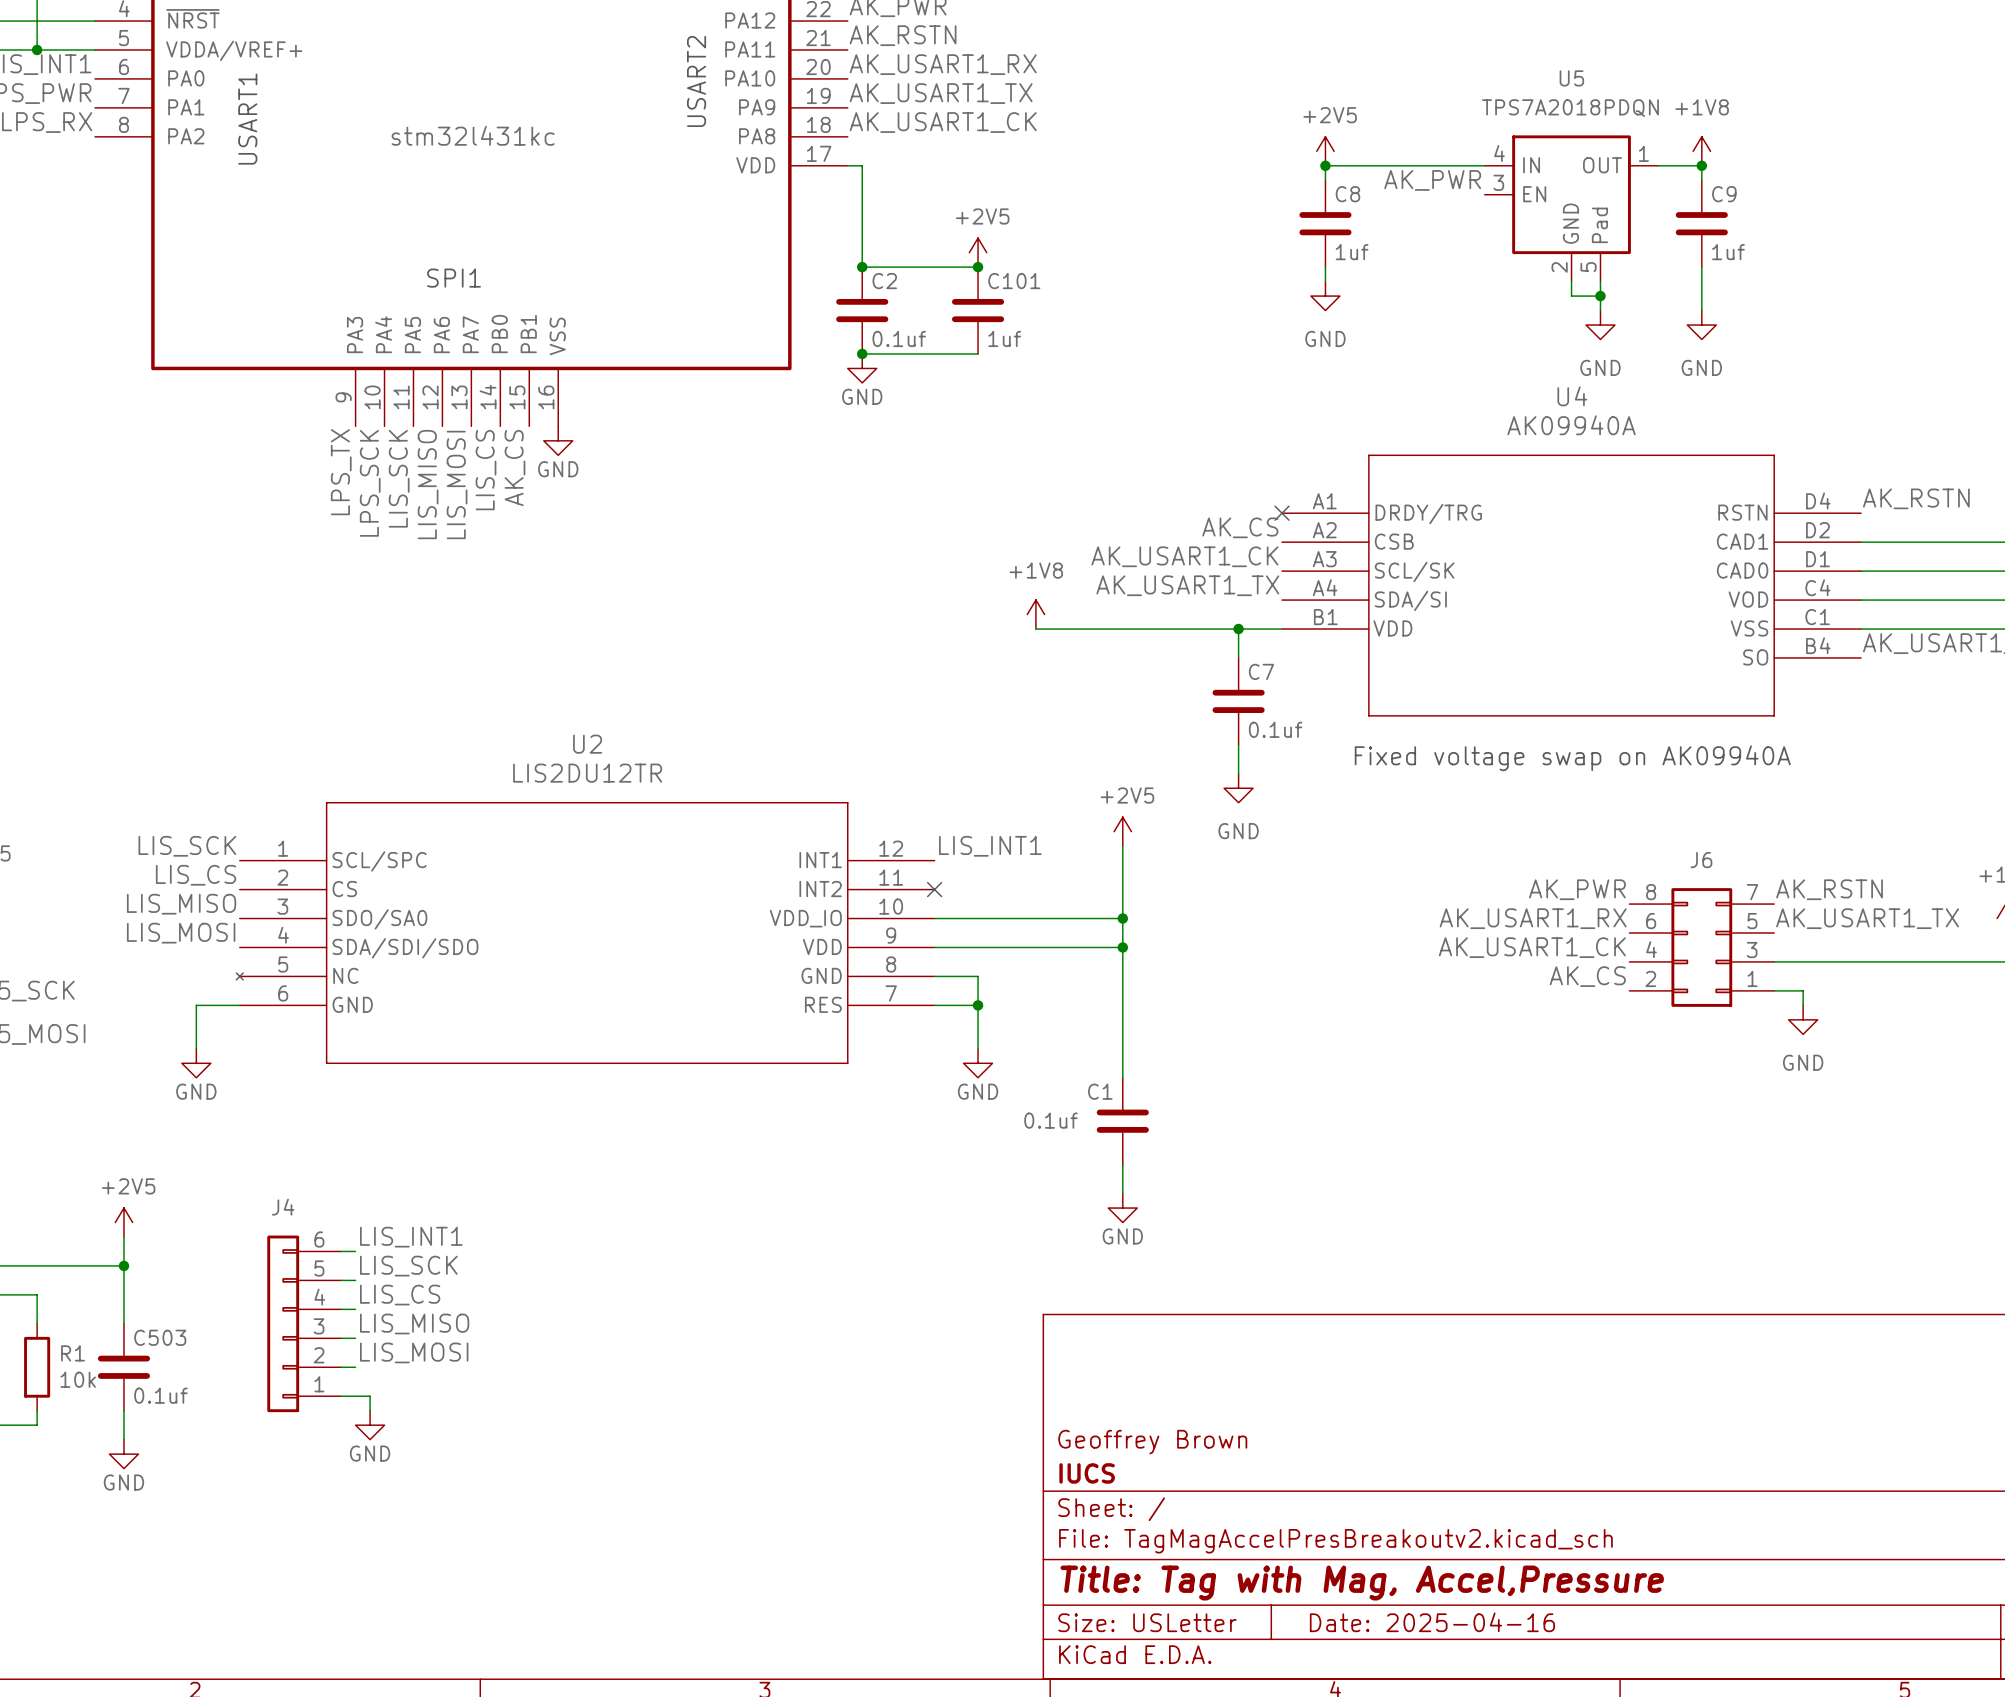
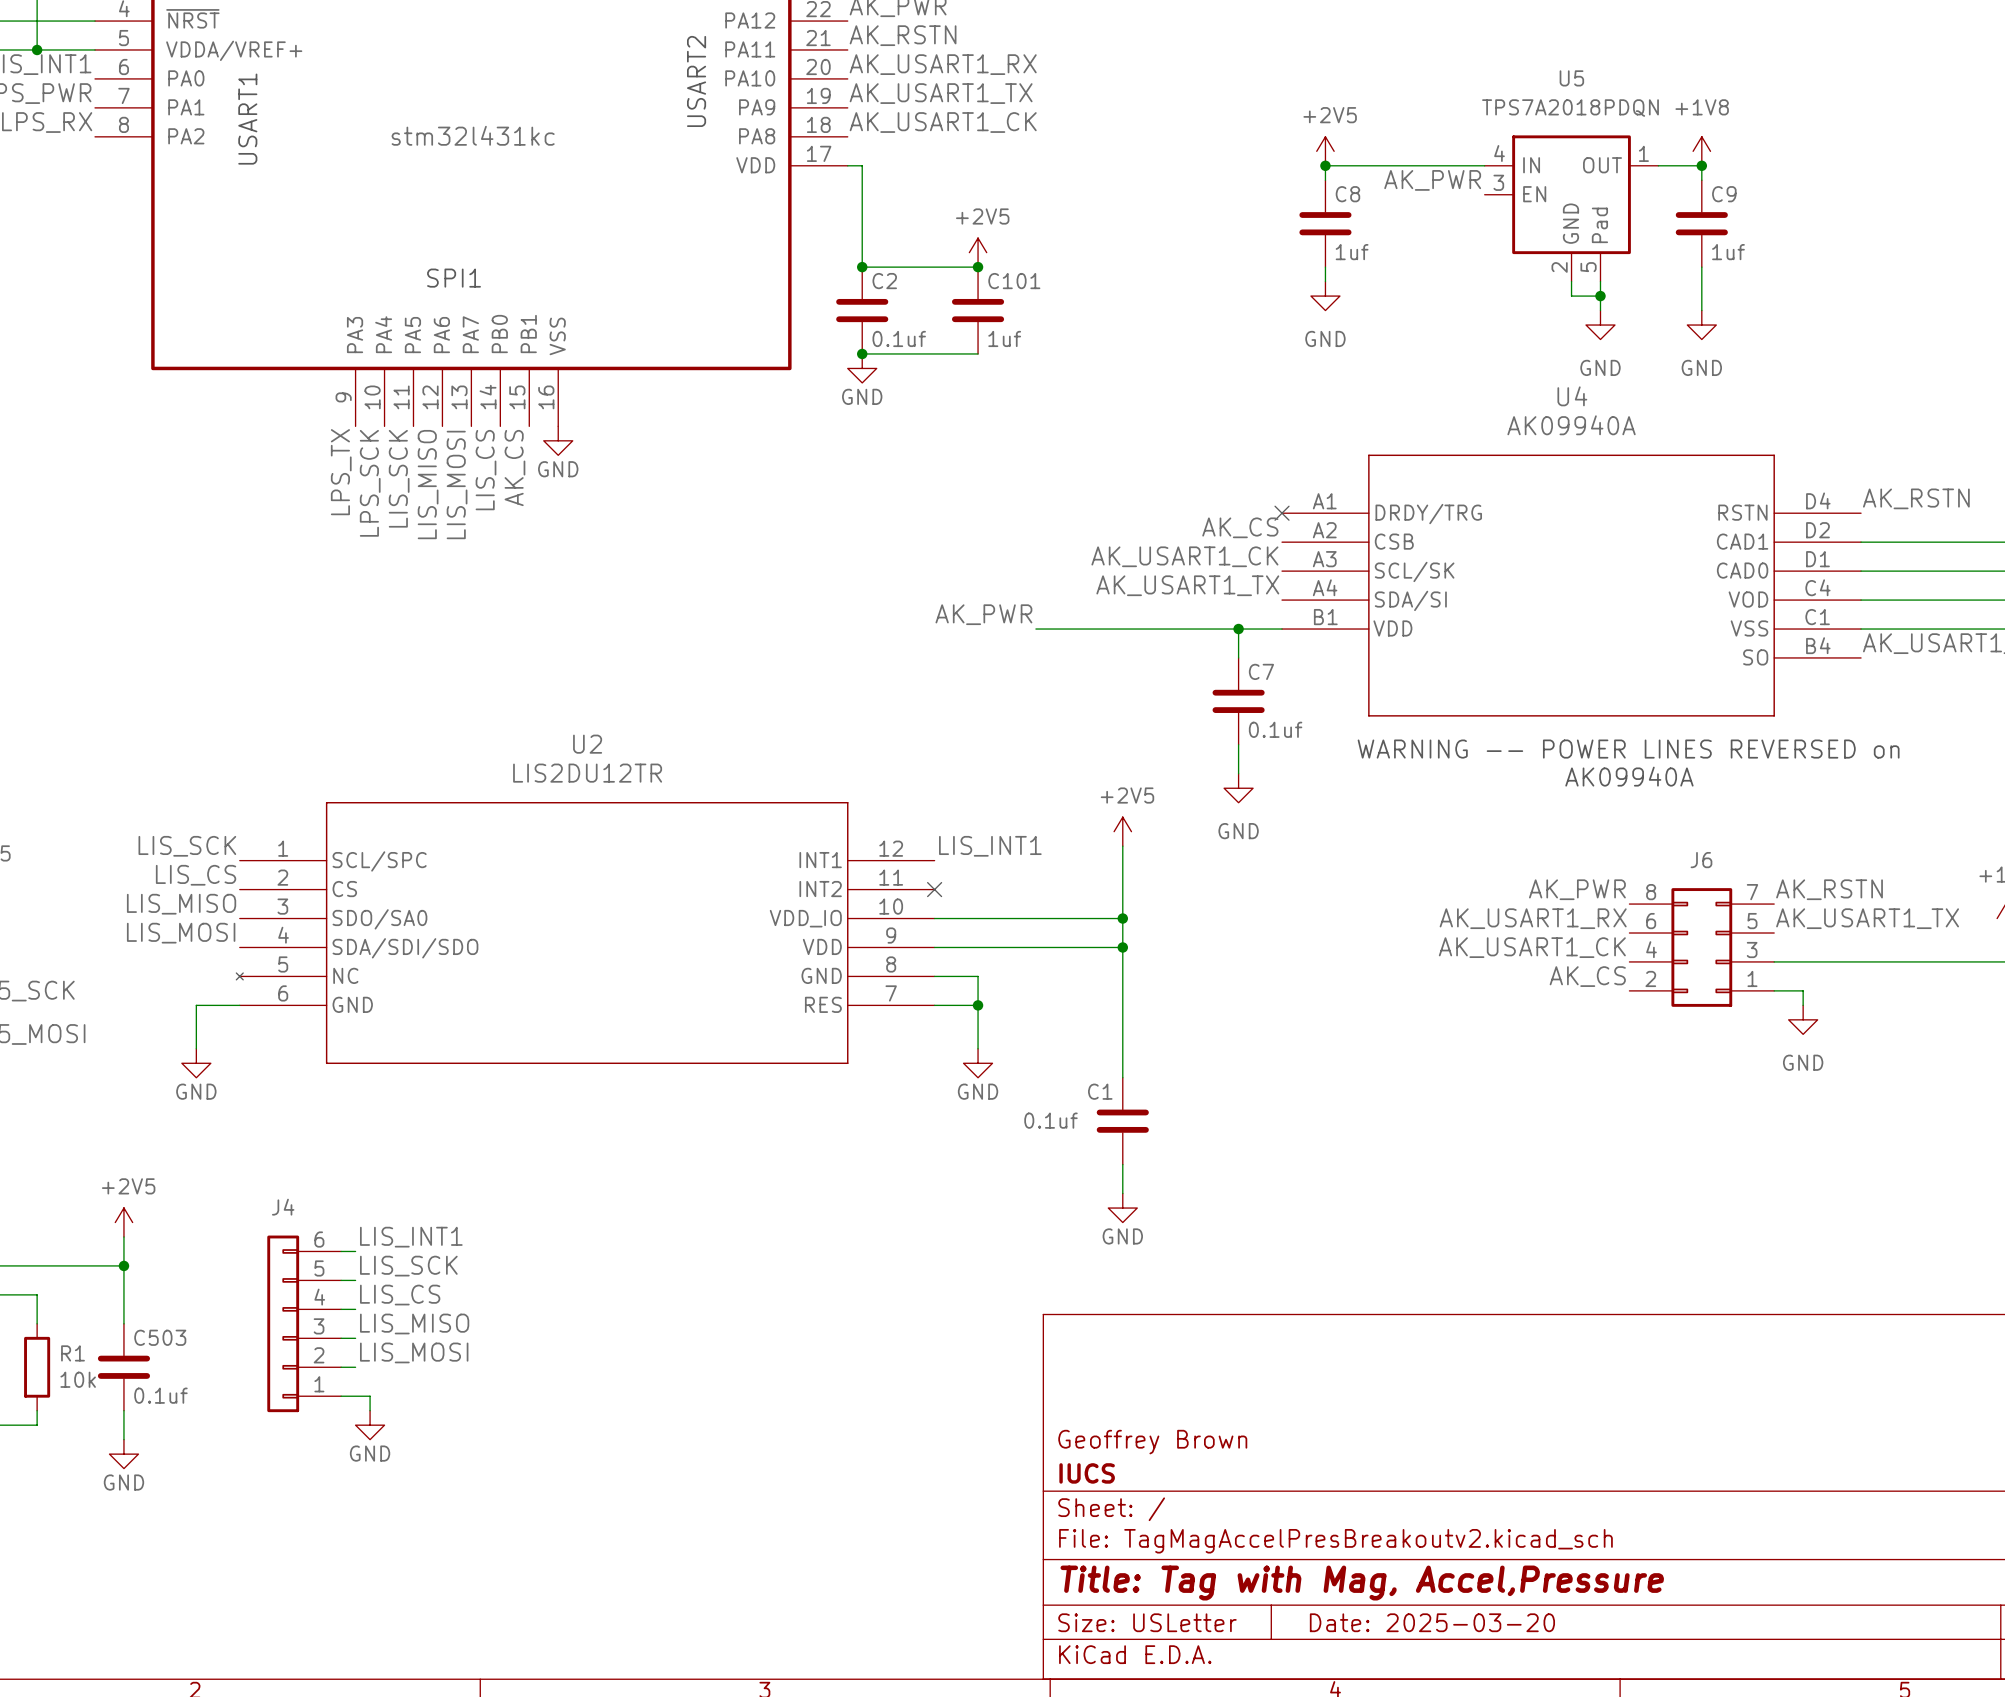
label: none -> AK_PWR (983, 614)
power symbol: +1V8 (1035, 614) -> none
text: none -> WARNING -- POWER LINES REVERSED on (1628, 749)
text: Fixed voltage swap on AK09940A (1572, 758) -> none
text: none -> AK09940A (1629, 776)
title block: Date: 2025-04-16 (1432, 1622) -> Date: 2025-03-20 (1432, 1622)

